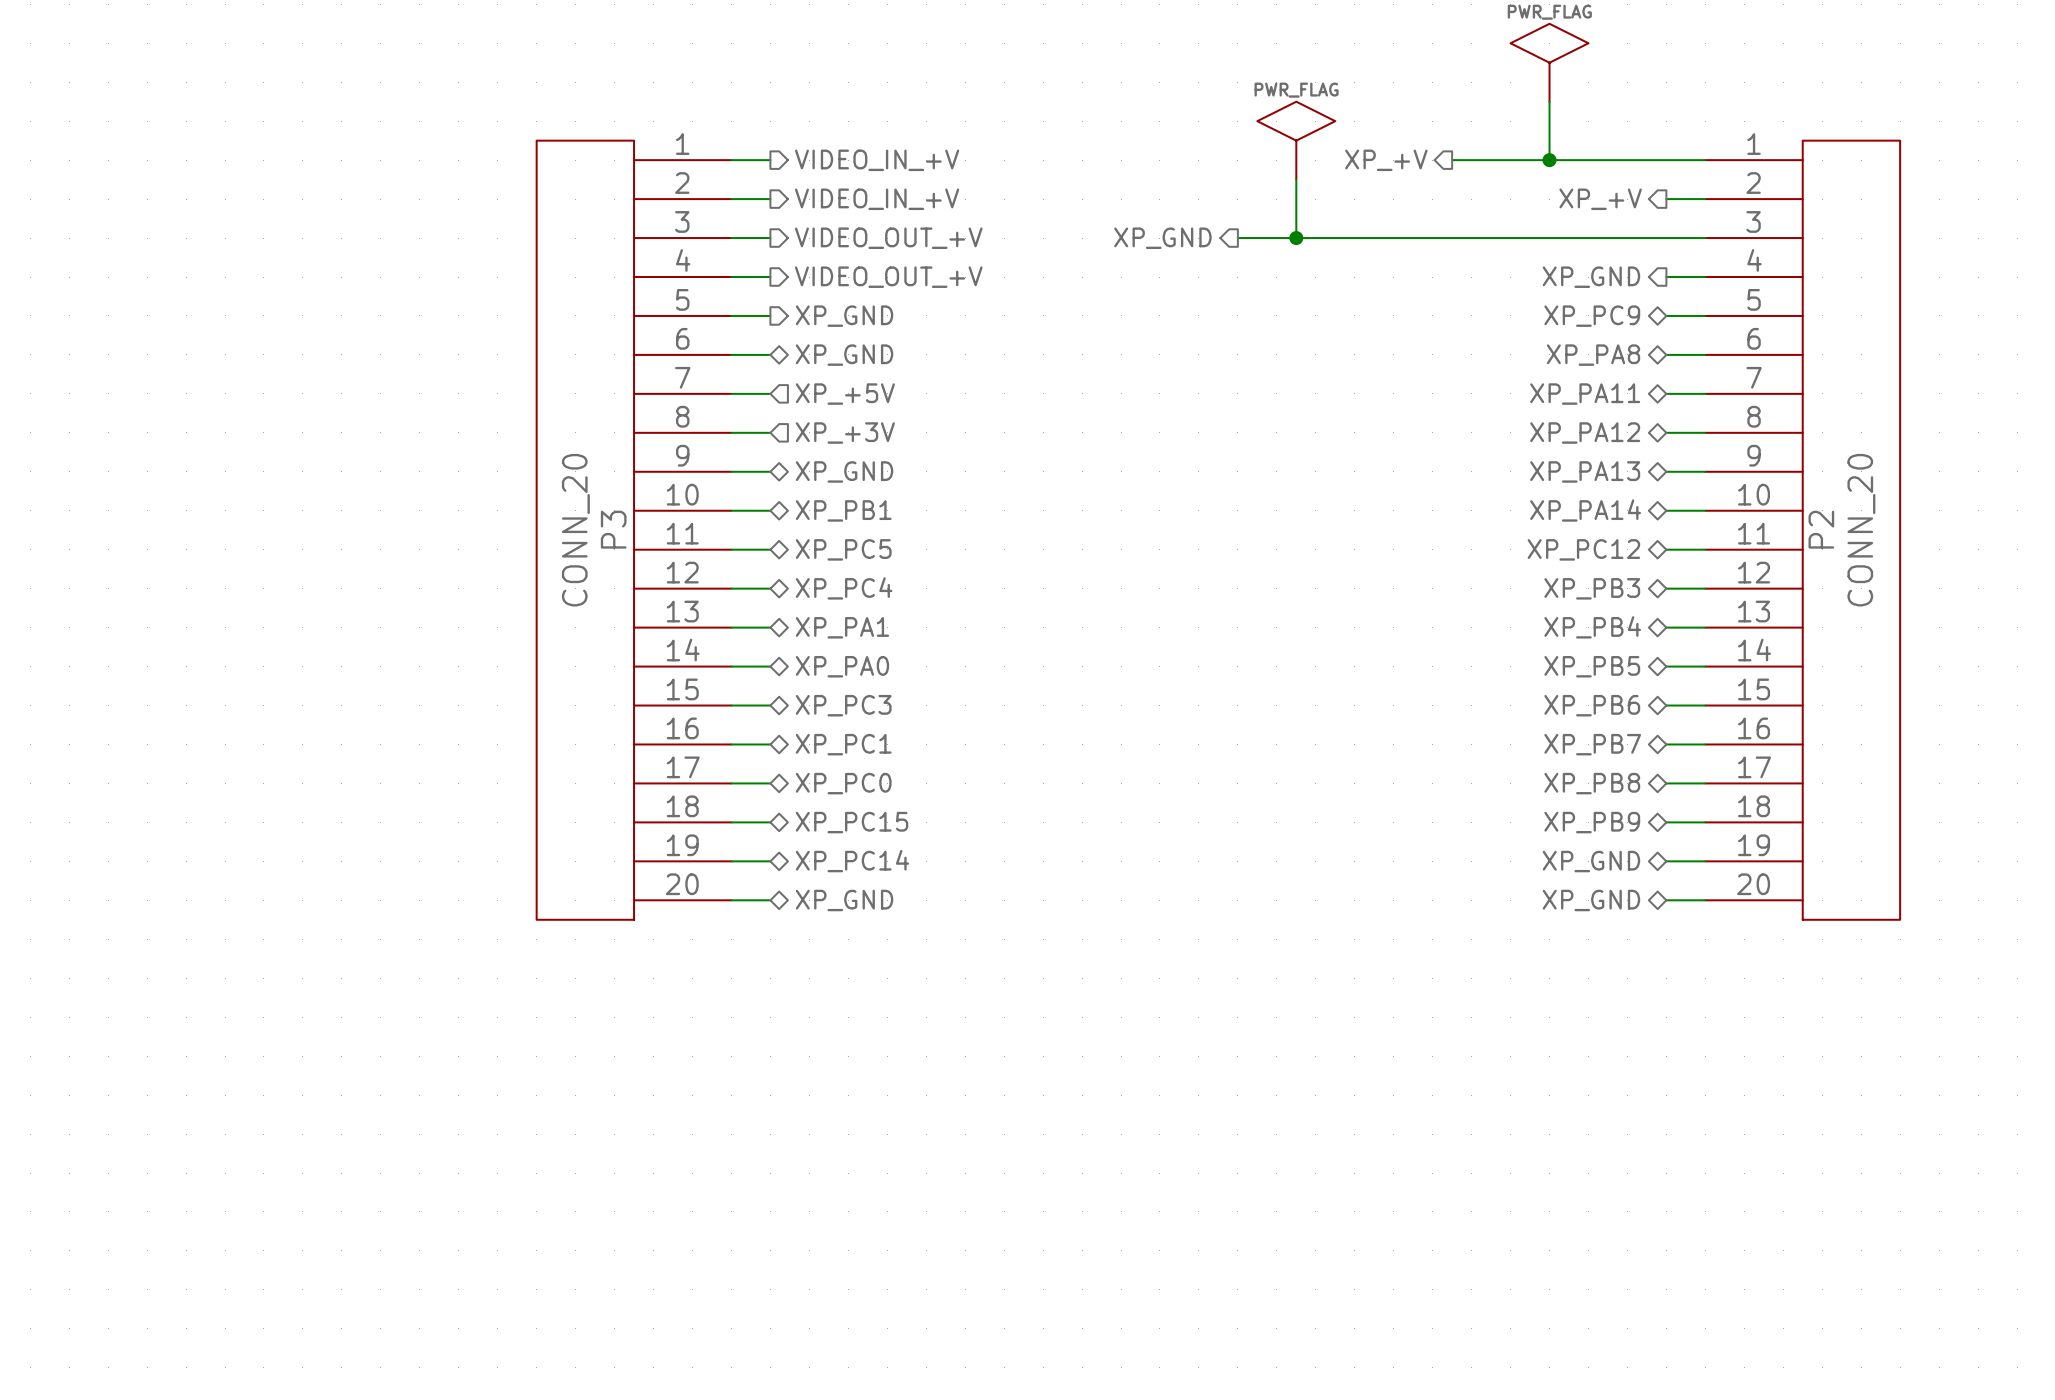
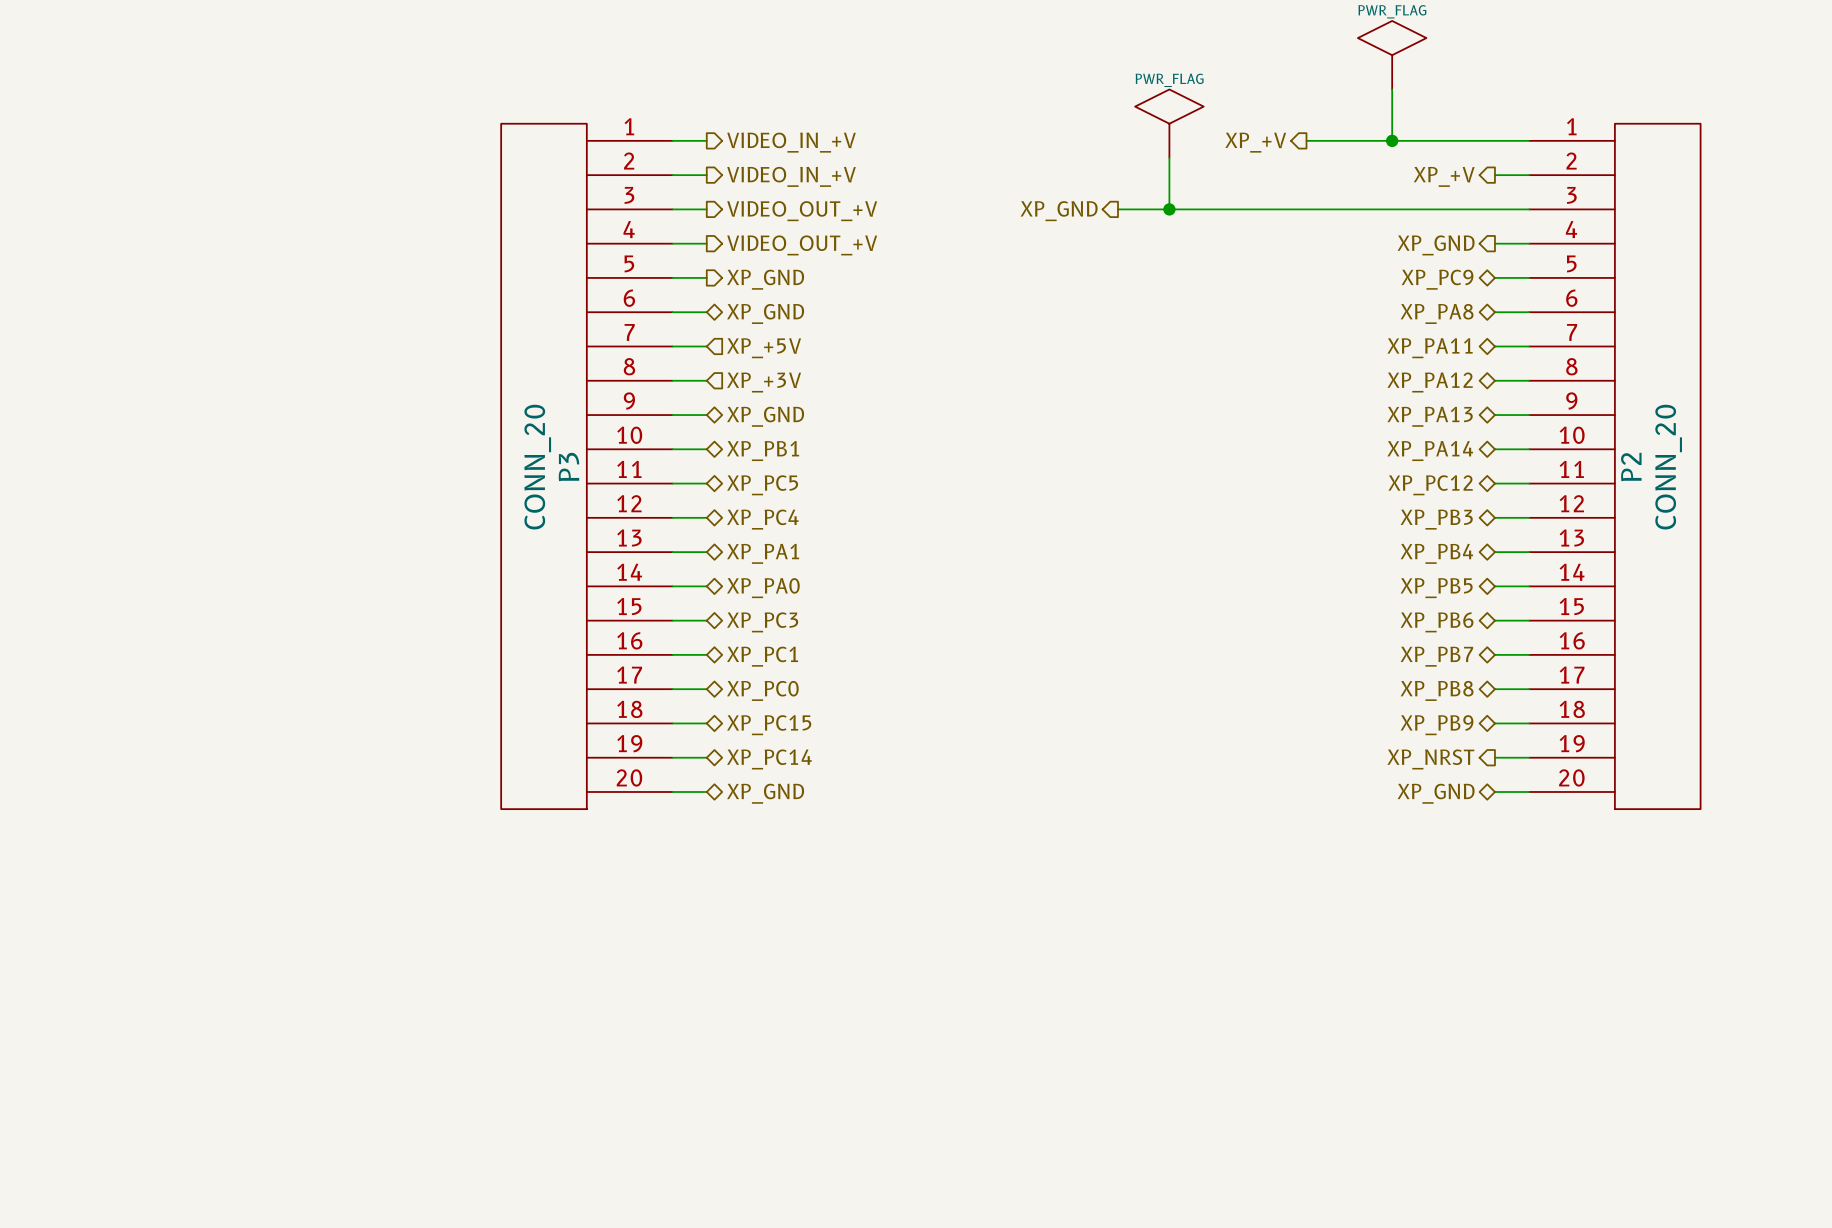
hierarchical label shape: bidirectional (1591, 861) -> output (1430, 759)
hierarchical label: XP_GND (1591, 861) -> XP_NRST (1430, 759)

